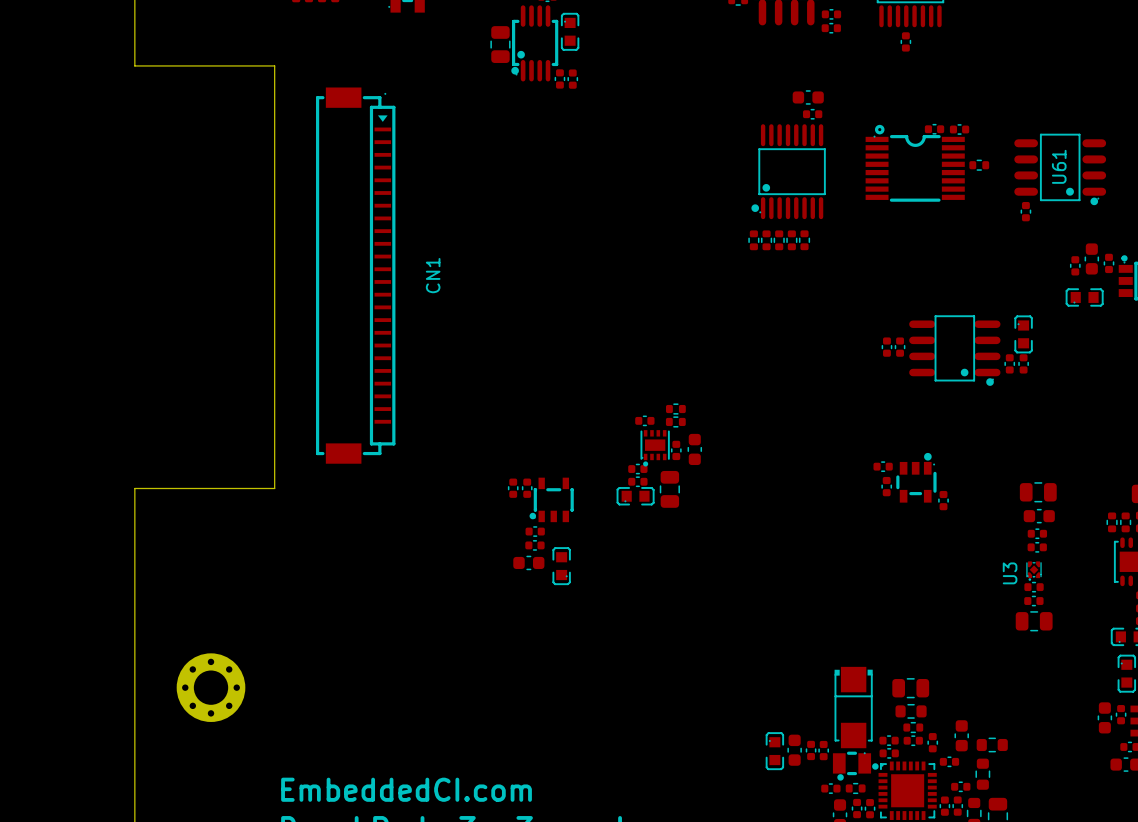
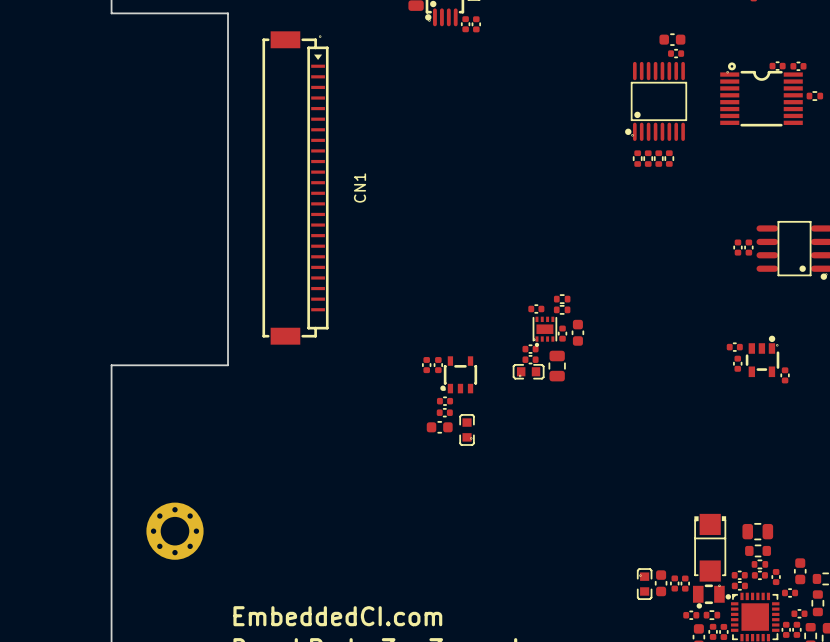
part: (753, 240) -> none

